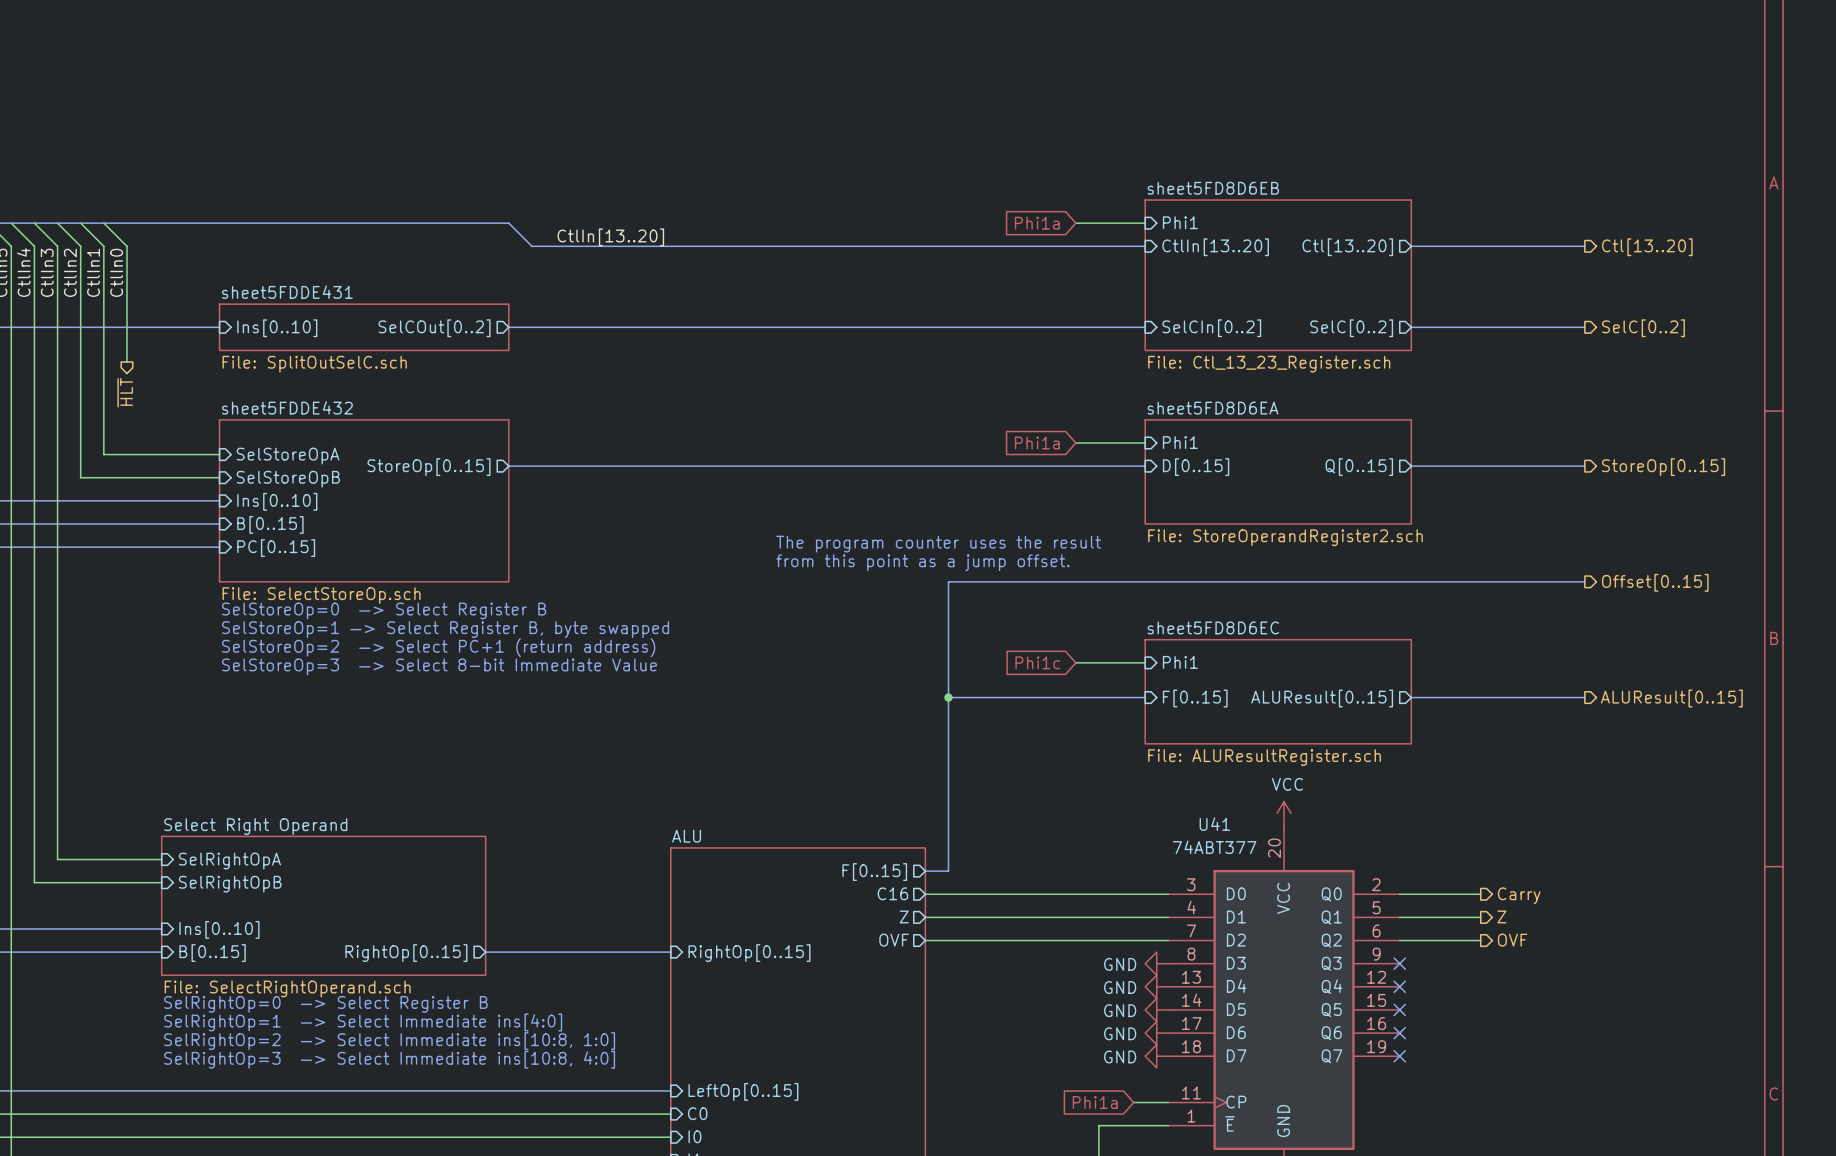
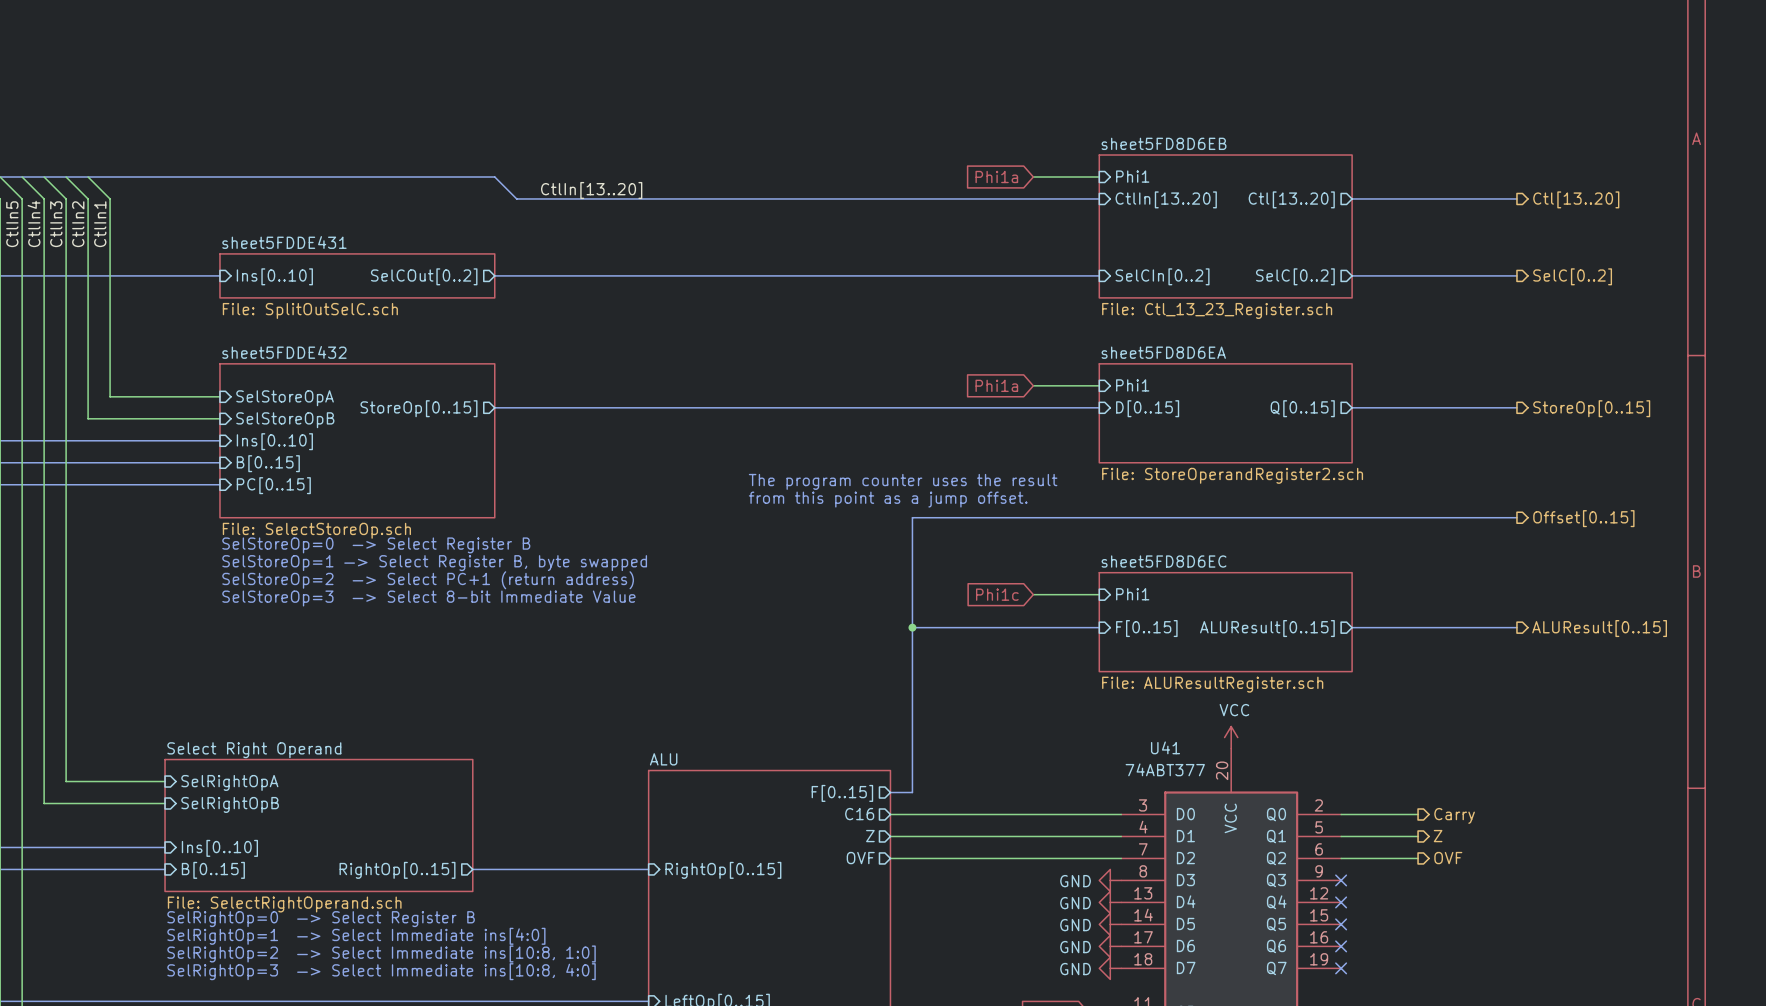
wire: (103, 223) (126, 246) (126, 362) -> none
label: CtlIn0 (116, 272) -> none
hierarchical label: ~{HLT} (125, 392) -> none

